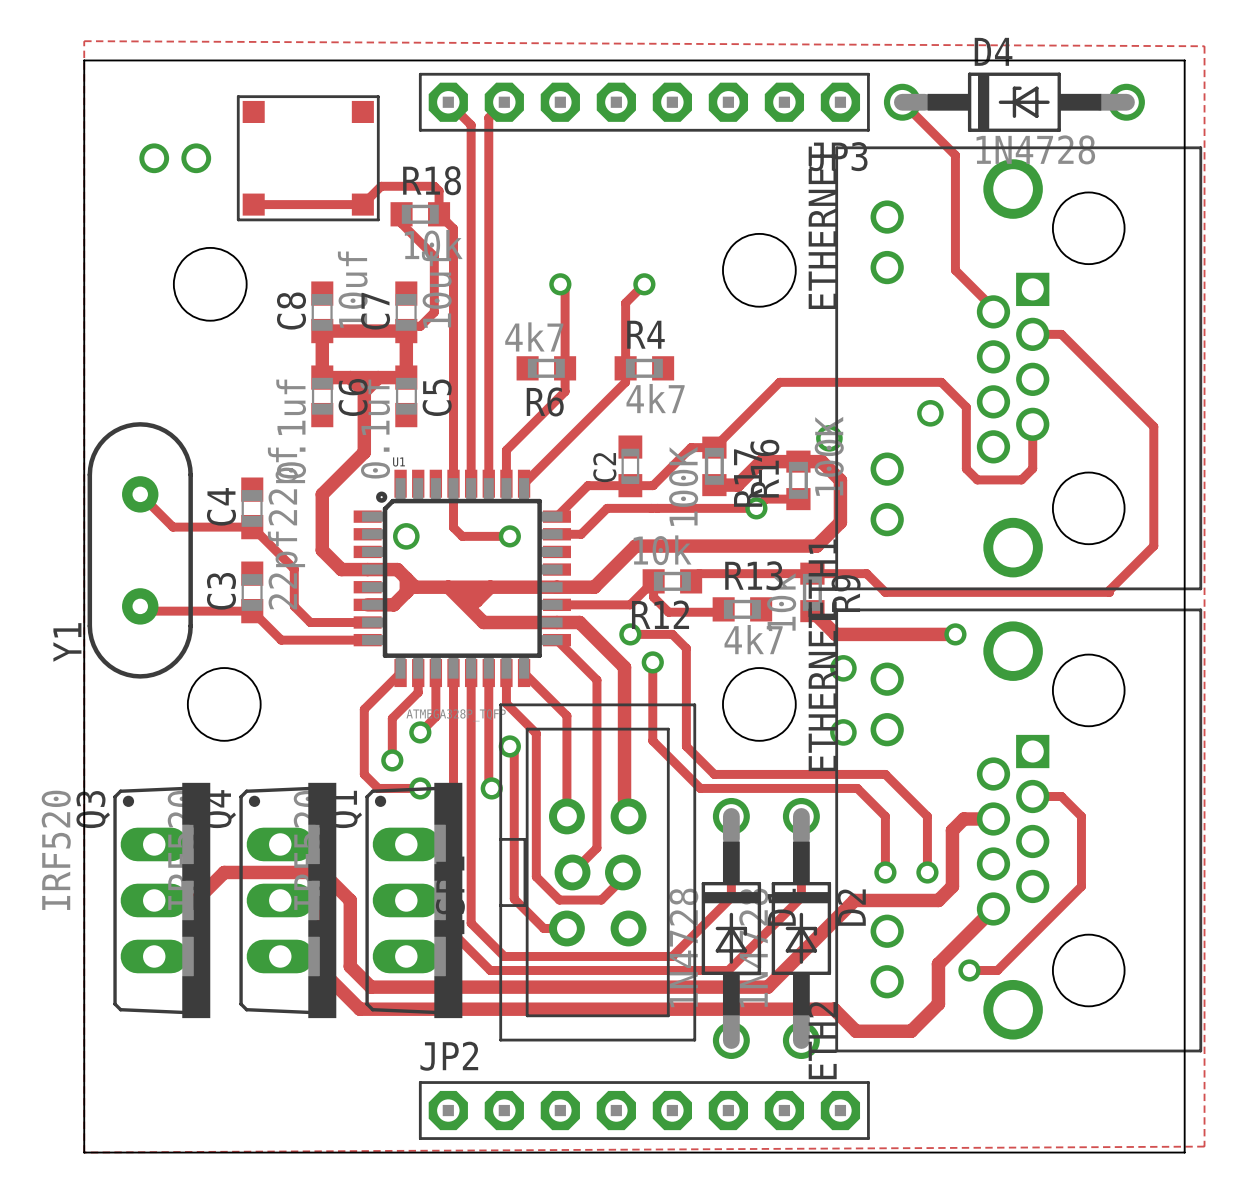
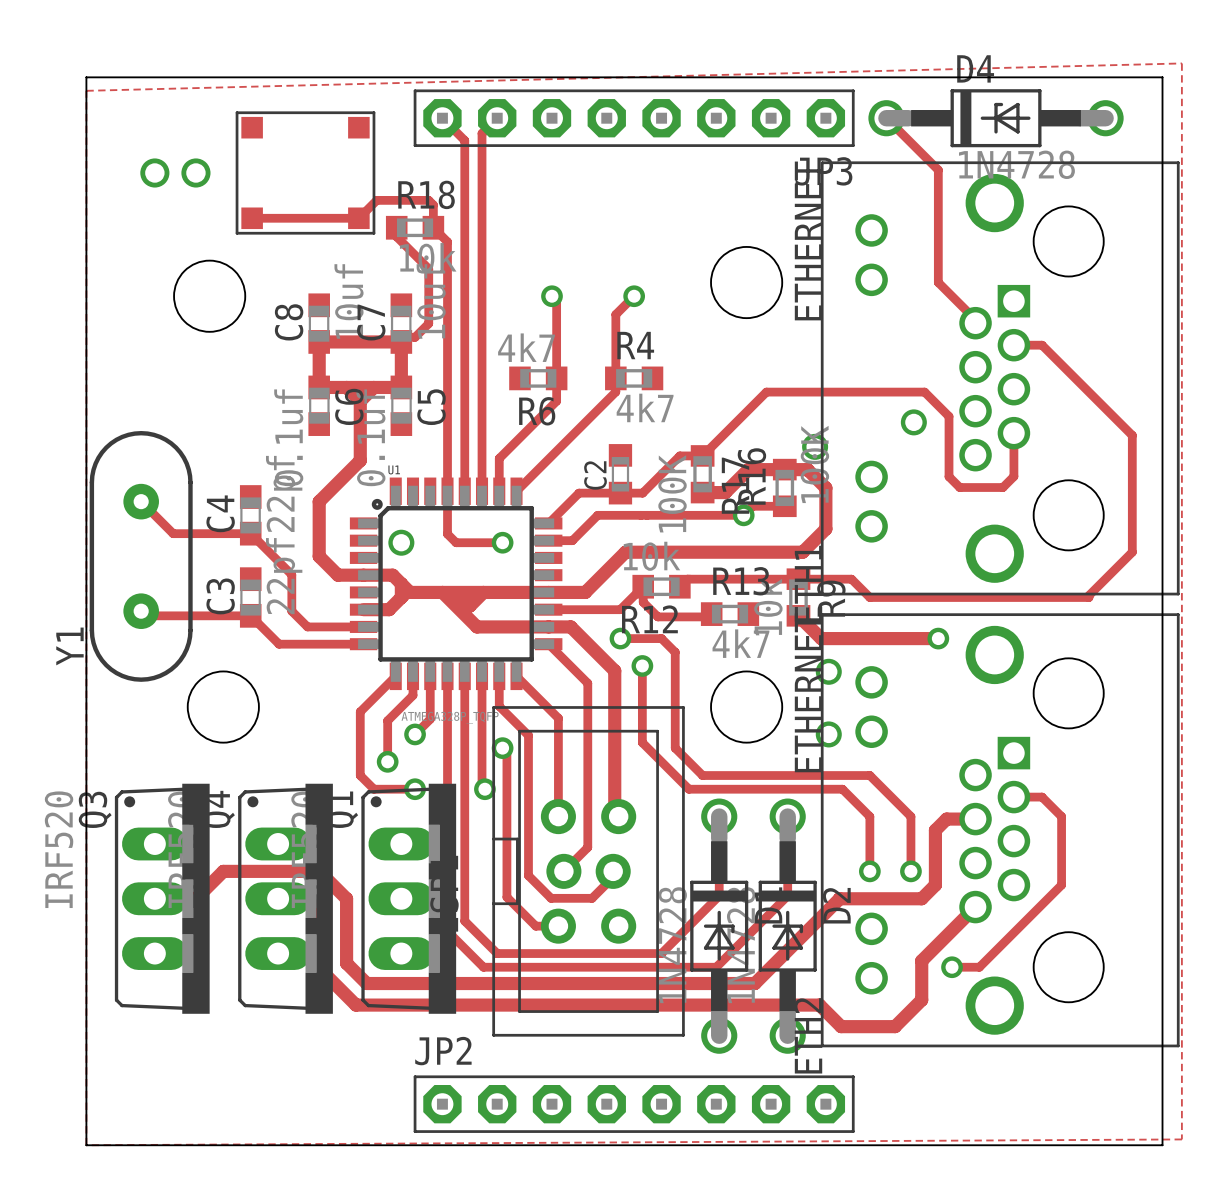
zone outline: (1204, 46) (84, 41) (84, 74) -> (1181, 63) (86, 90)

